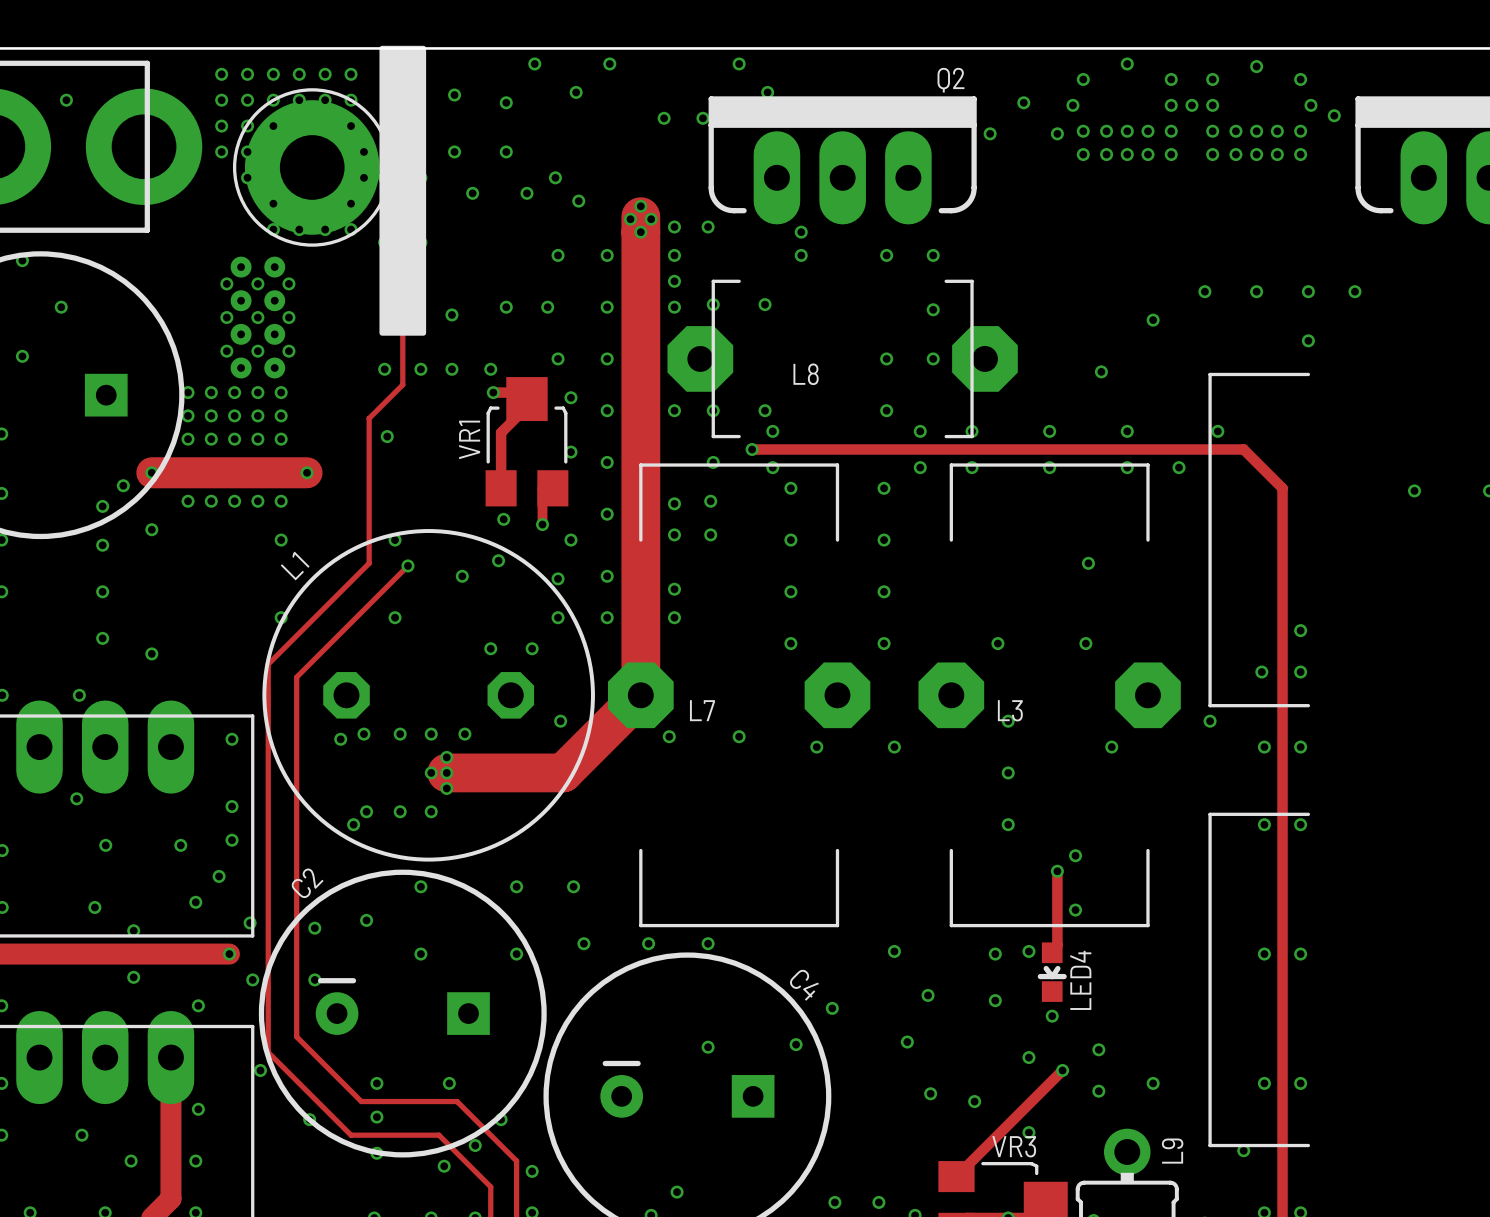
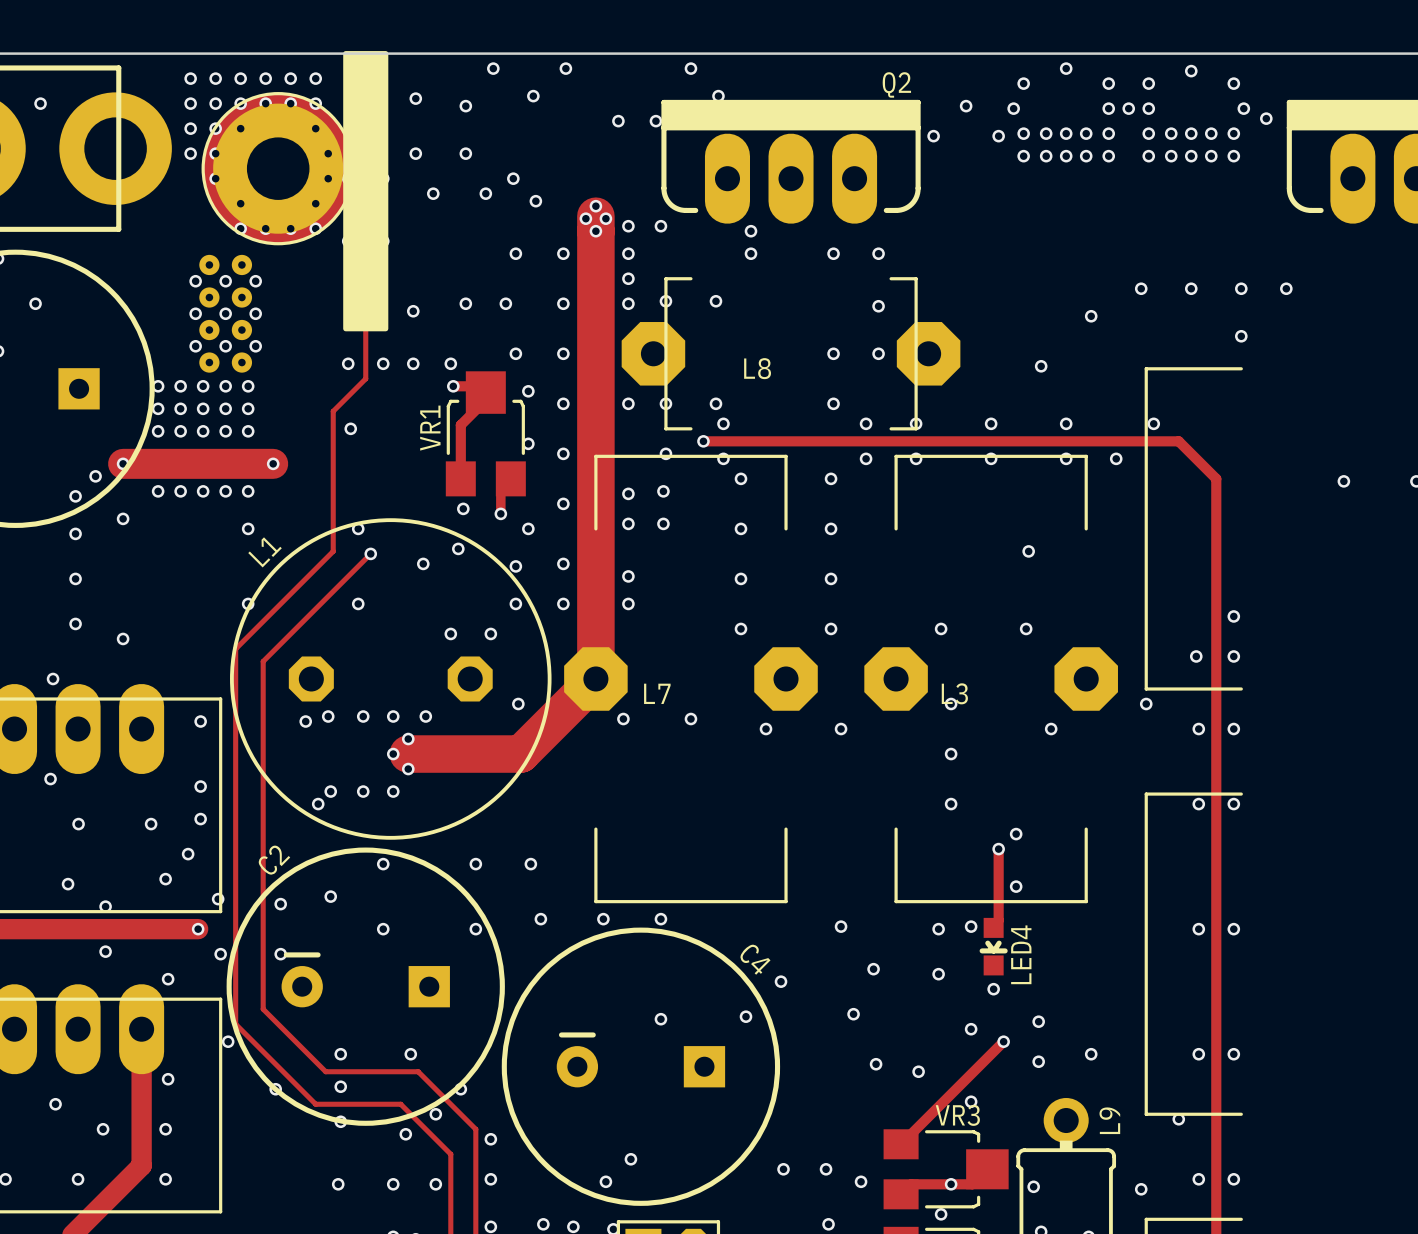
part footprint: [232, 88, 392, 247] -> [201, 92, 355, 246]
via: (446, 772) -> none

